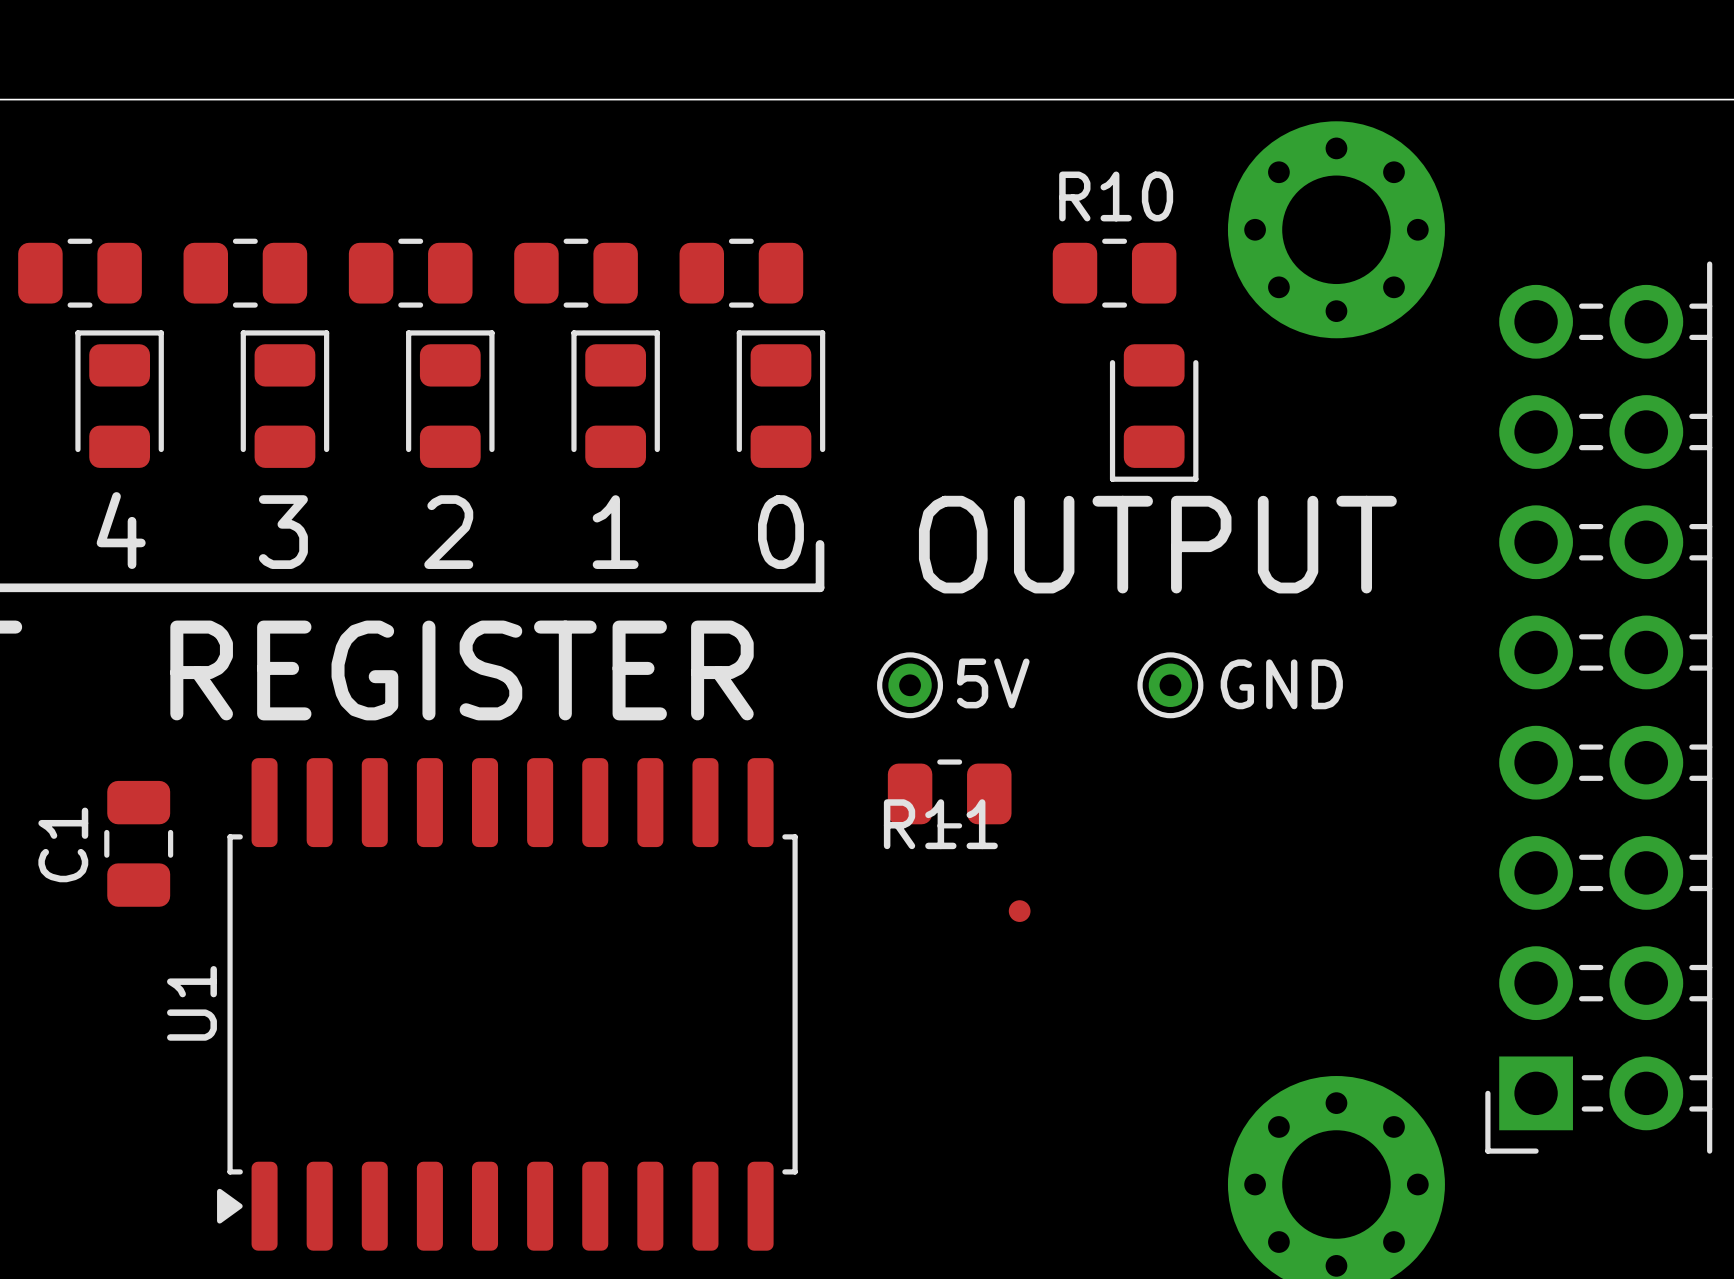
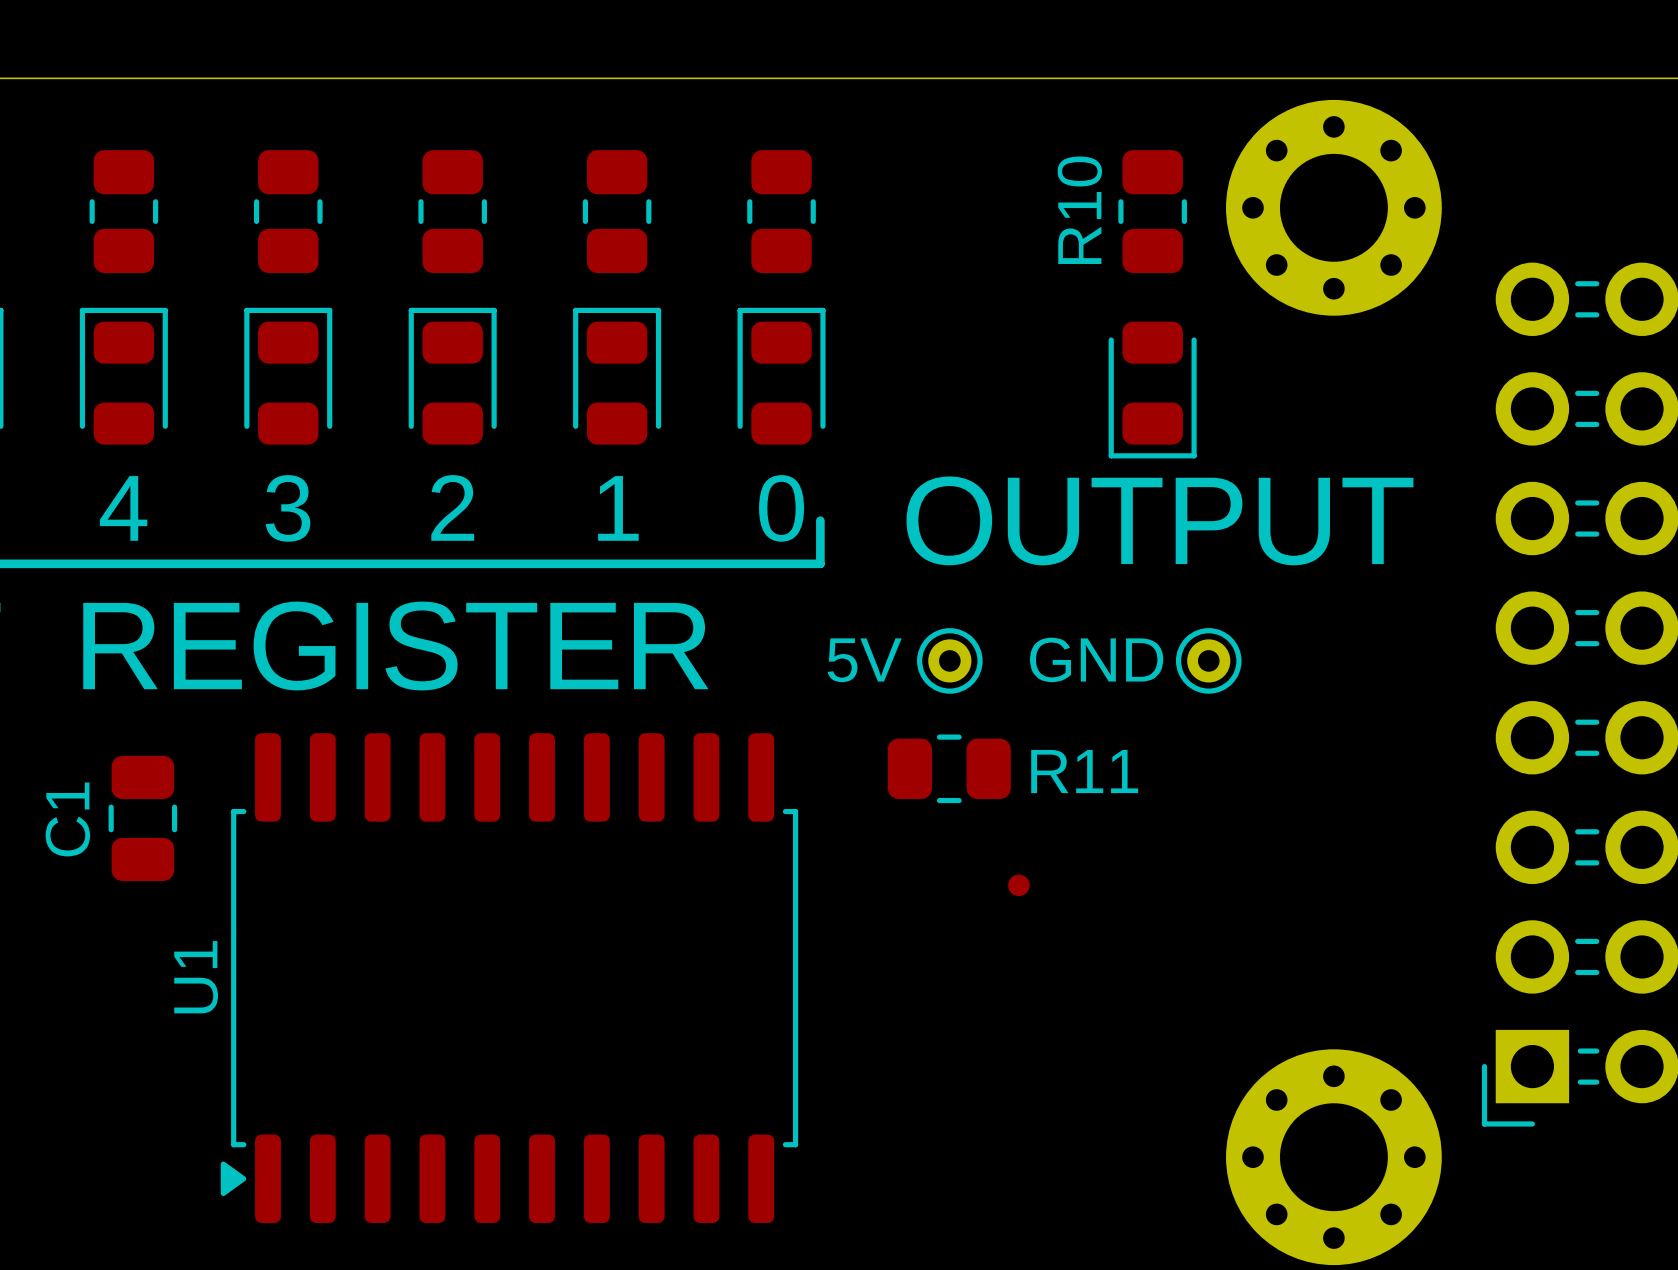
R10 name position: R10 (1116, 196) -> R10 (1079, 210)
part rotation: 0° (80, 273) -> 90° clockwise (123, 211)
part rotation: 0° (245, 273) -> 90° clockwise (288, 211)
part rotation: 0° (410, 273) -> 90° clockwise (452, 211)
part rotation: 0° (576, 273) -> 90° clockwise (617, 211)
part rotation: 0° (741, 273) -> 90° clockwise (781, 211)
R10 rotation: 0° (1114, 273) -> 90° clockwise (1152, 211)
text position: 5V (993, 683) -> 5V (864, 660)
text position: GND (1281, 684) -> GND (1096, 659)
part position: (910, 685) -> (949, 660)
part position: (1170, 685) -> (1208, 660)
R11 name position: R11 (940, 824) -> R11 (1084, 771)

